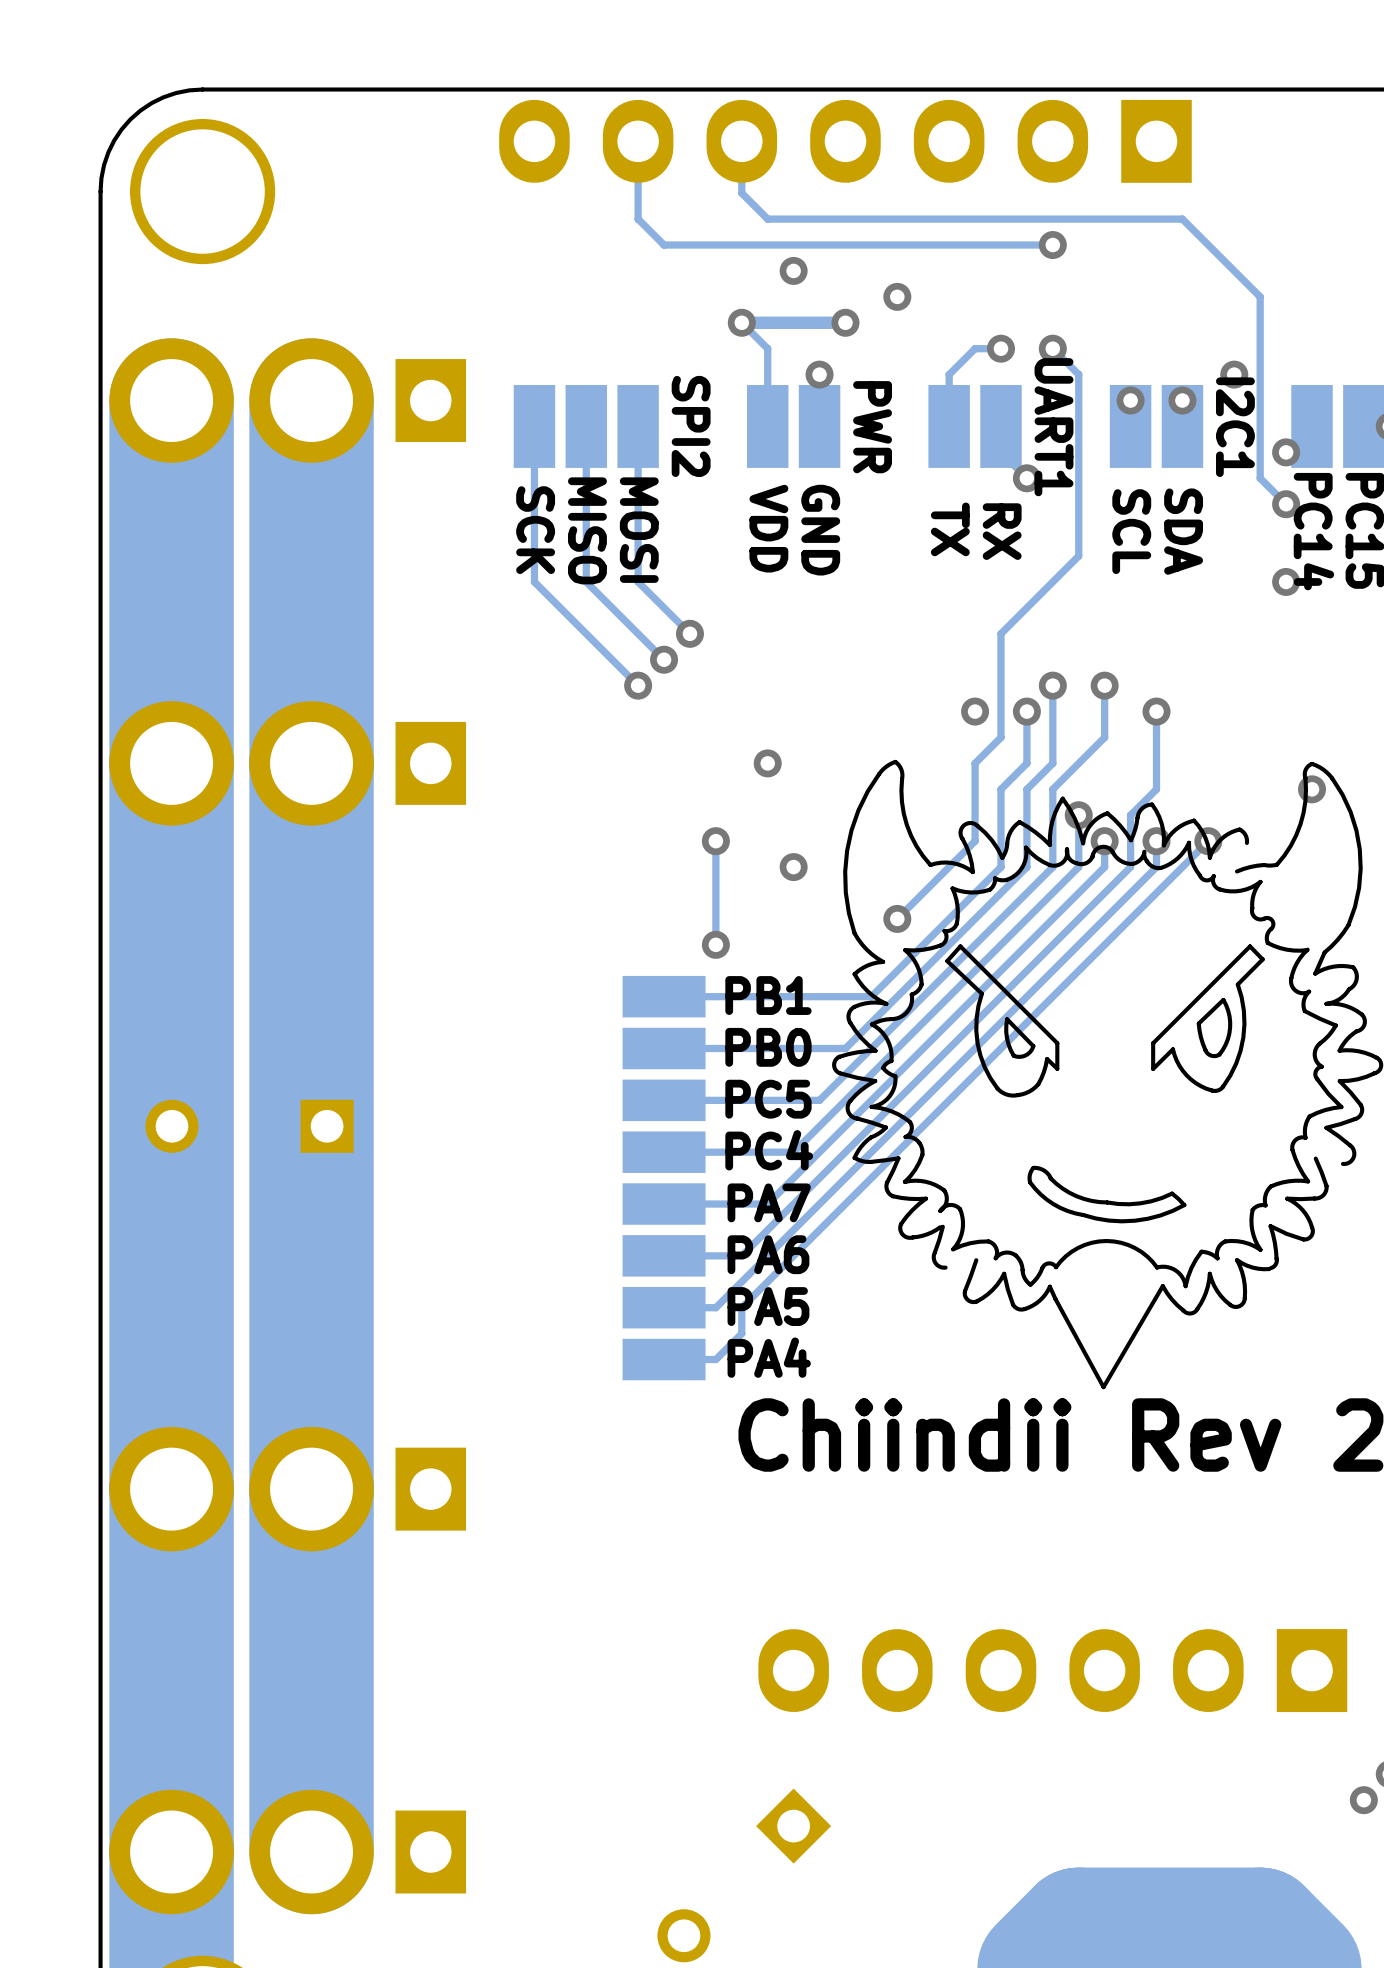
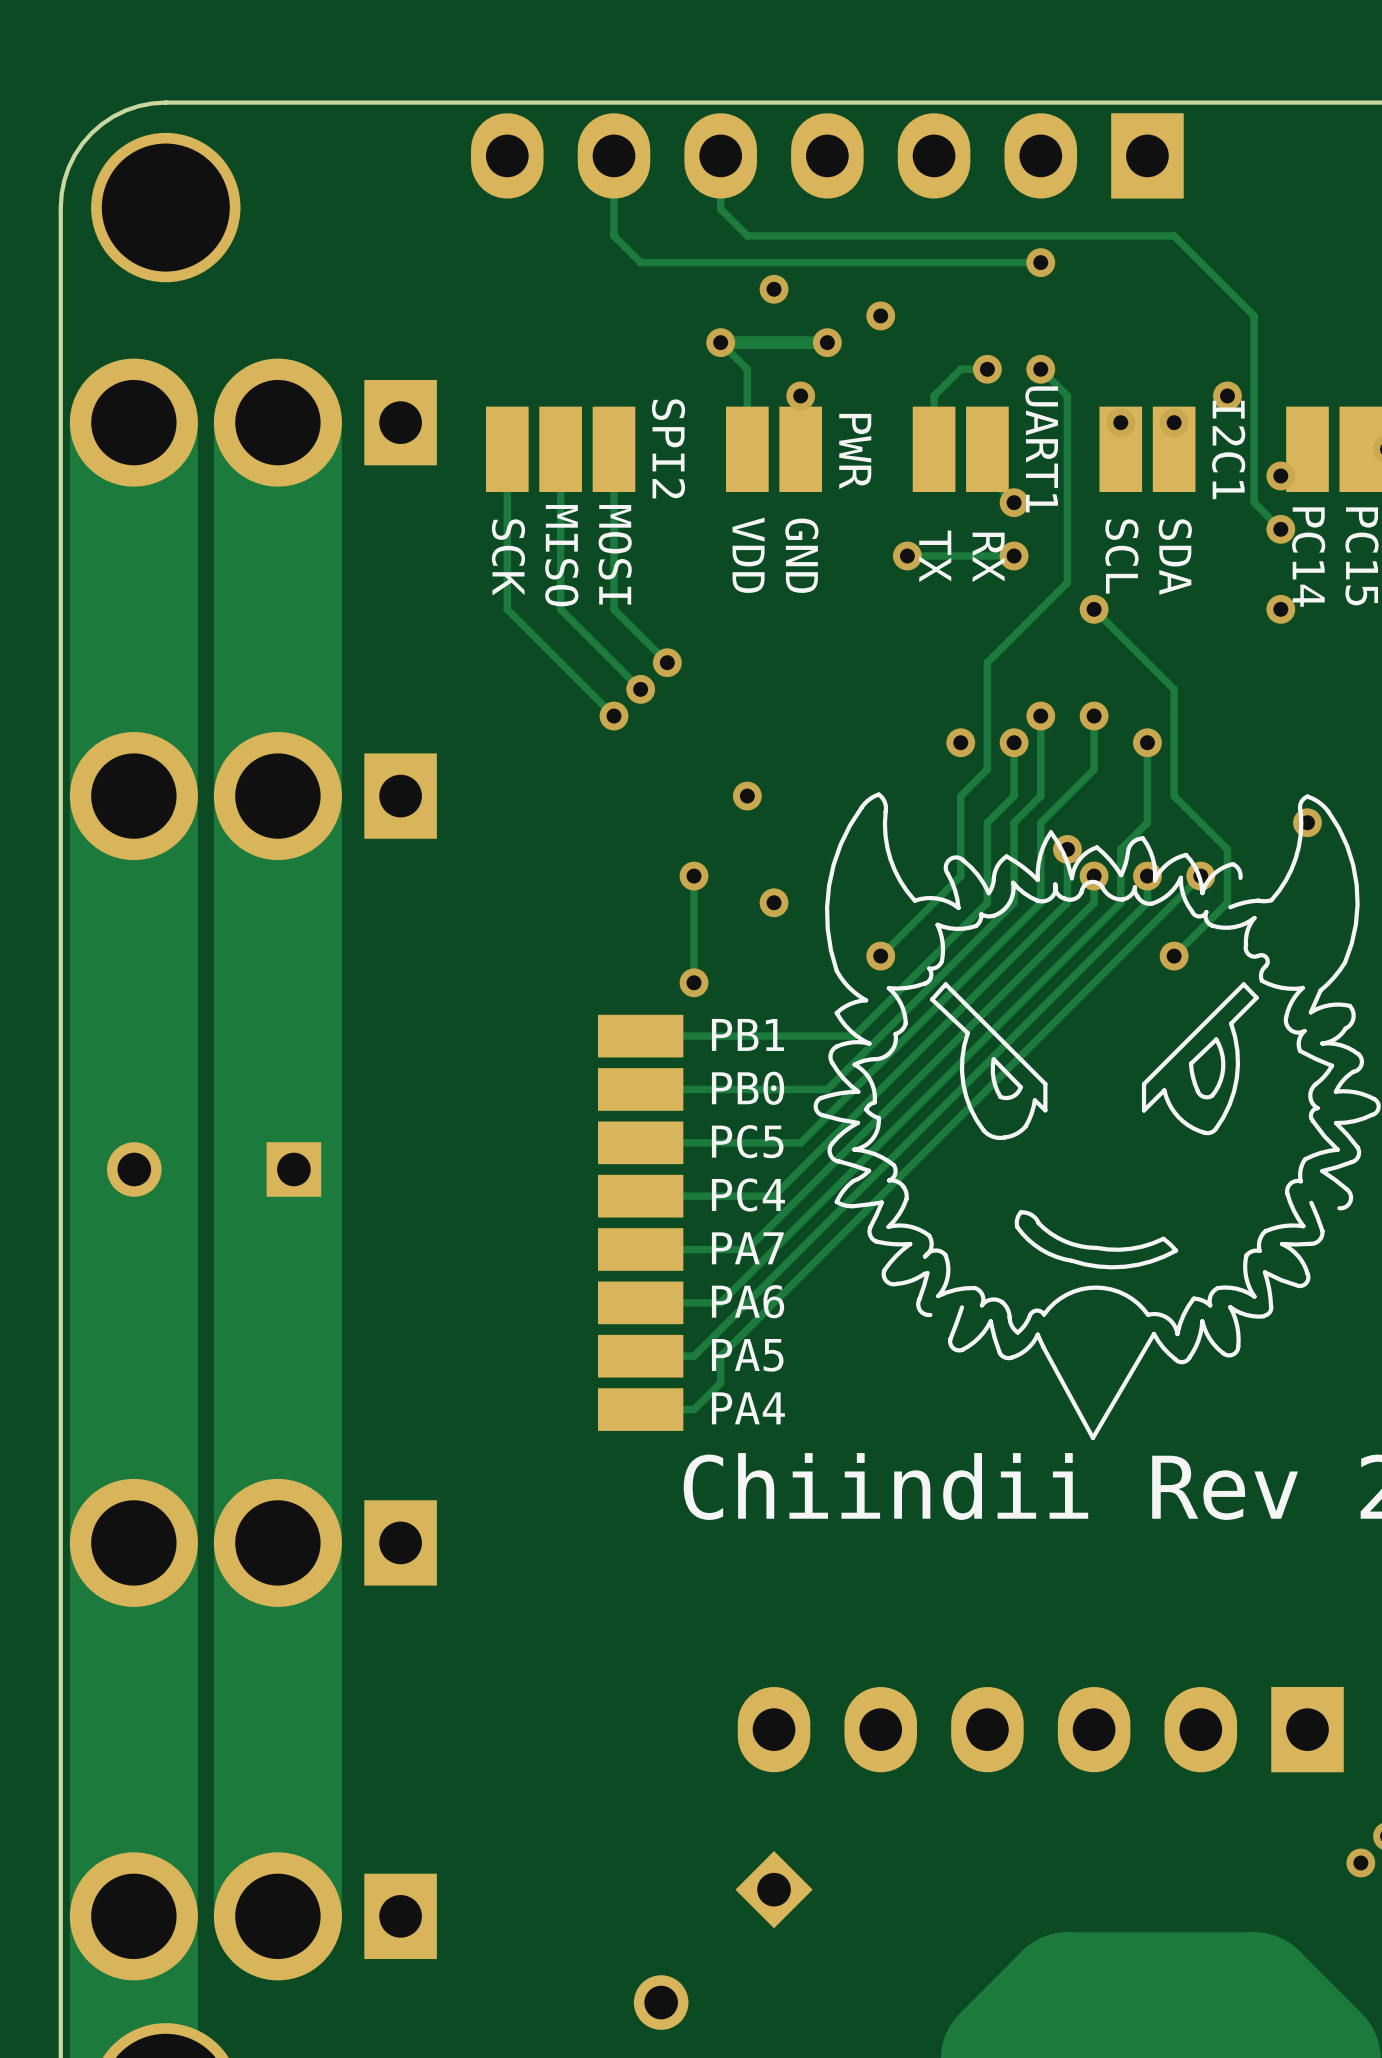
via: none -> (907, 556)
track: none -> (1014, 556) (907, 556)
via: none -> (1014, 556)
track: none -> (1094, 609) (1174, 689) (1174, 796) (1227, 849) (1227, 902) (1174, 956)
via: none -> (1094, 609)
via: none -> (1174, 956)

